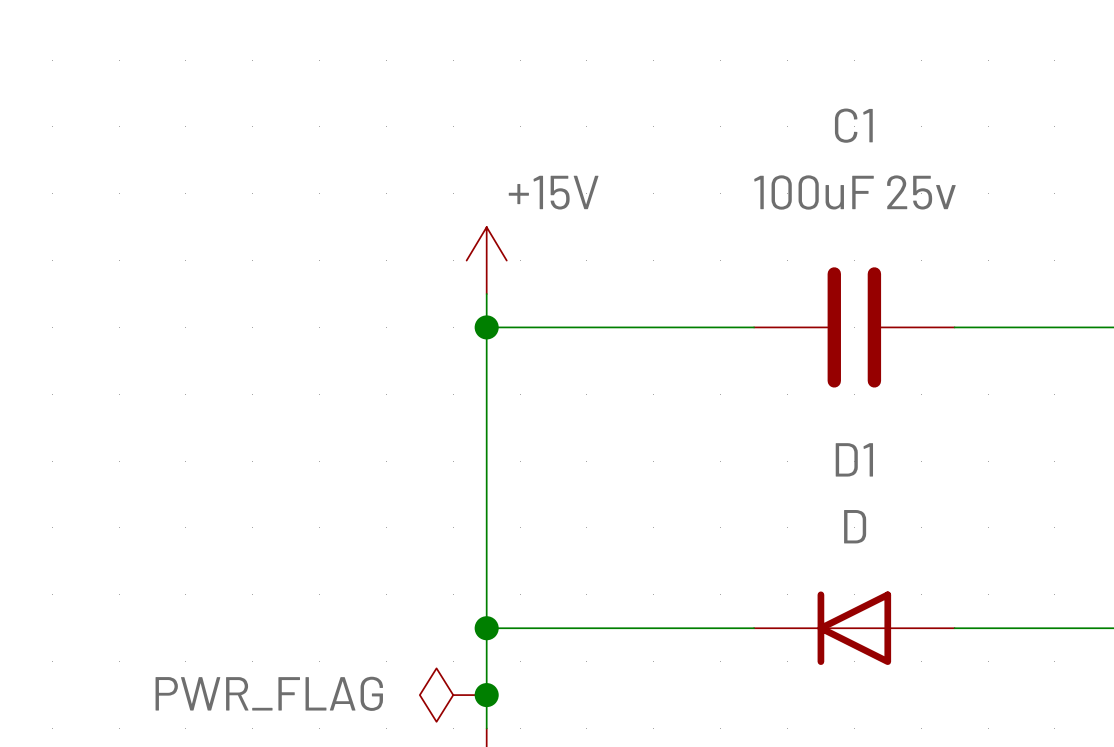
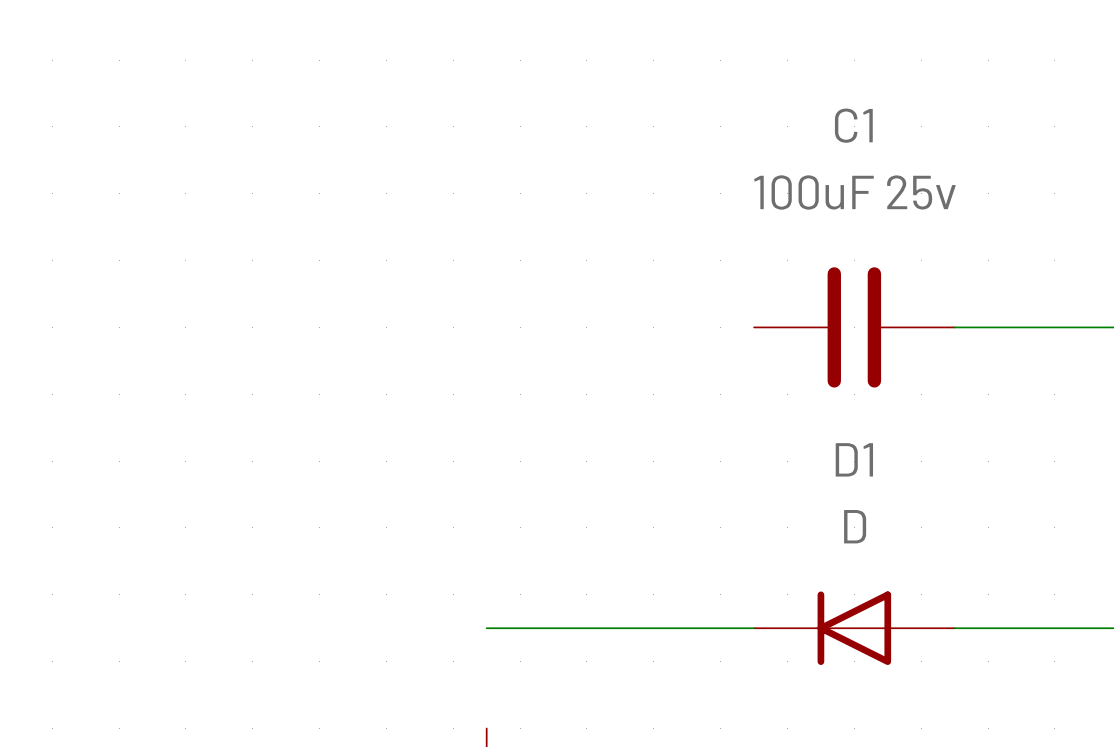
power symbol: +15V (486, 260) -> none
wire: (486, 293) (486, 728) -> none
wire: (486, 327) (754, 327) -> none
junction: (486, 327) -> none
junction: (486, 628) -> none
power symbol: PWR_FLAG (453, 695) -> none
junction: (486, 695) -> none

